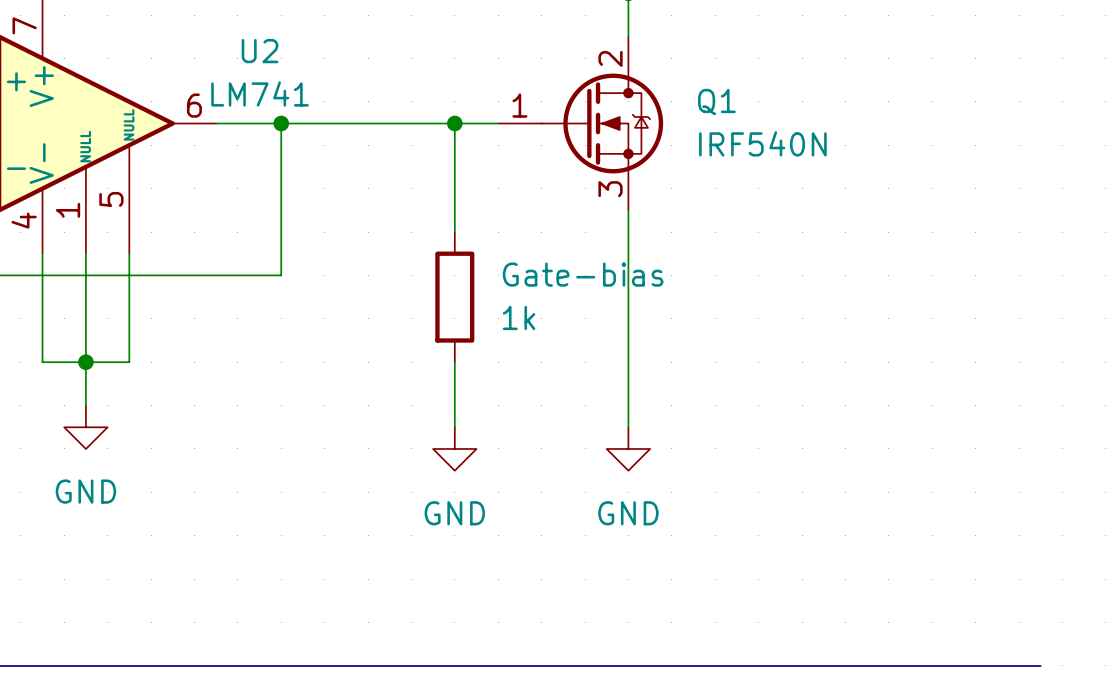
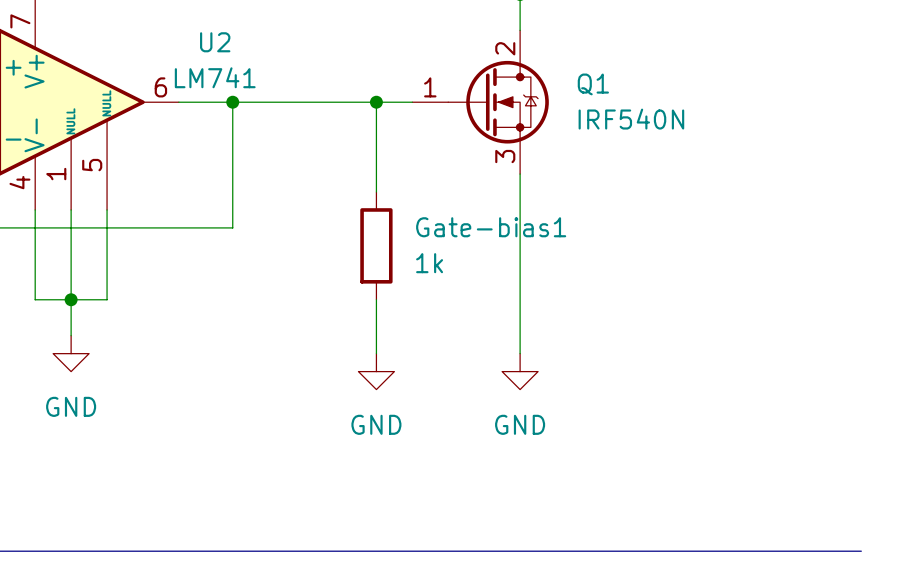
Gate-bias name: Gate-bias (583, 274) -> Gate-bias1 (491, 227)

